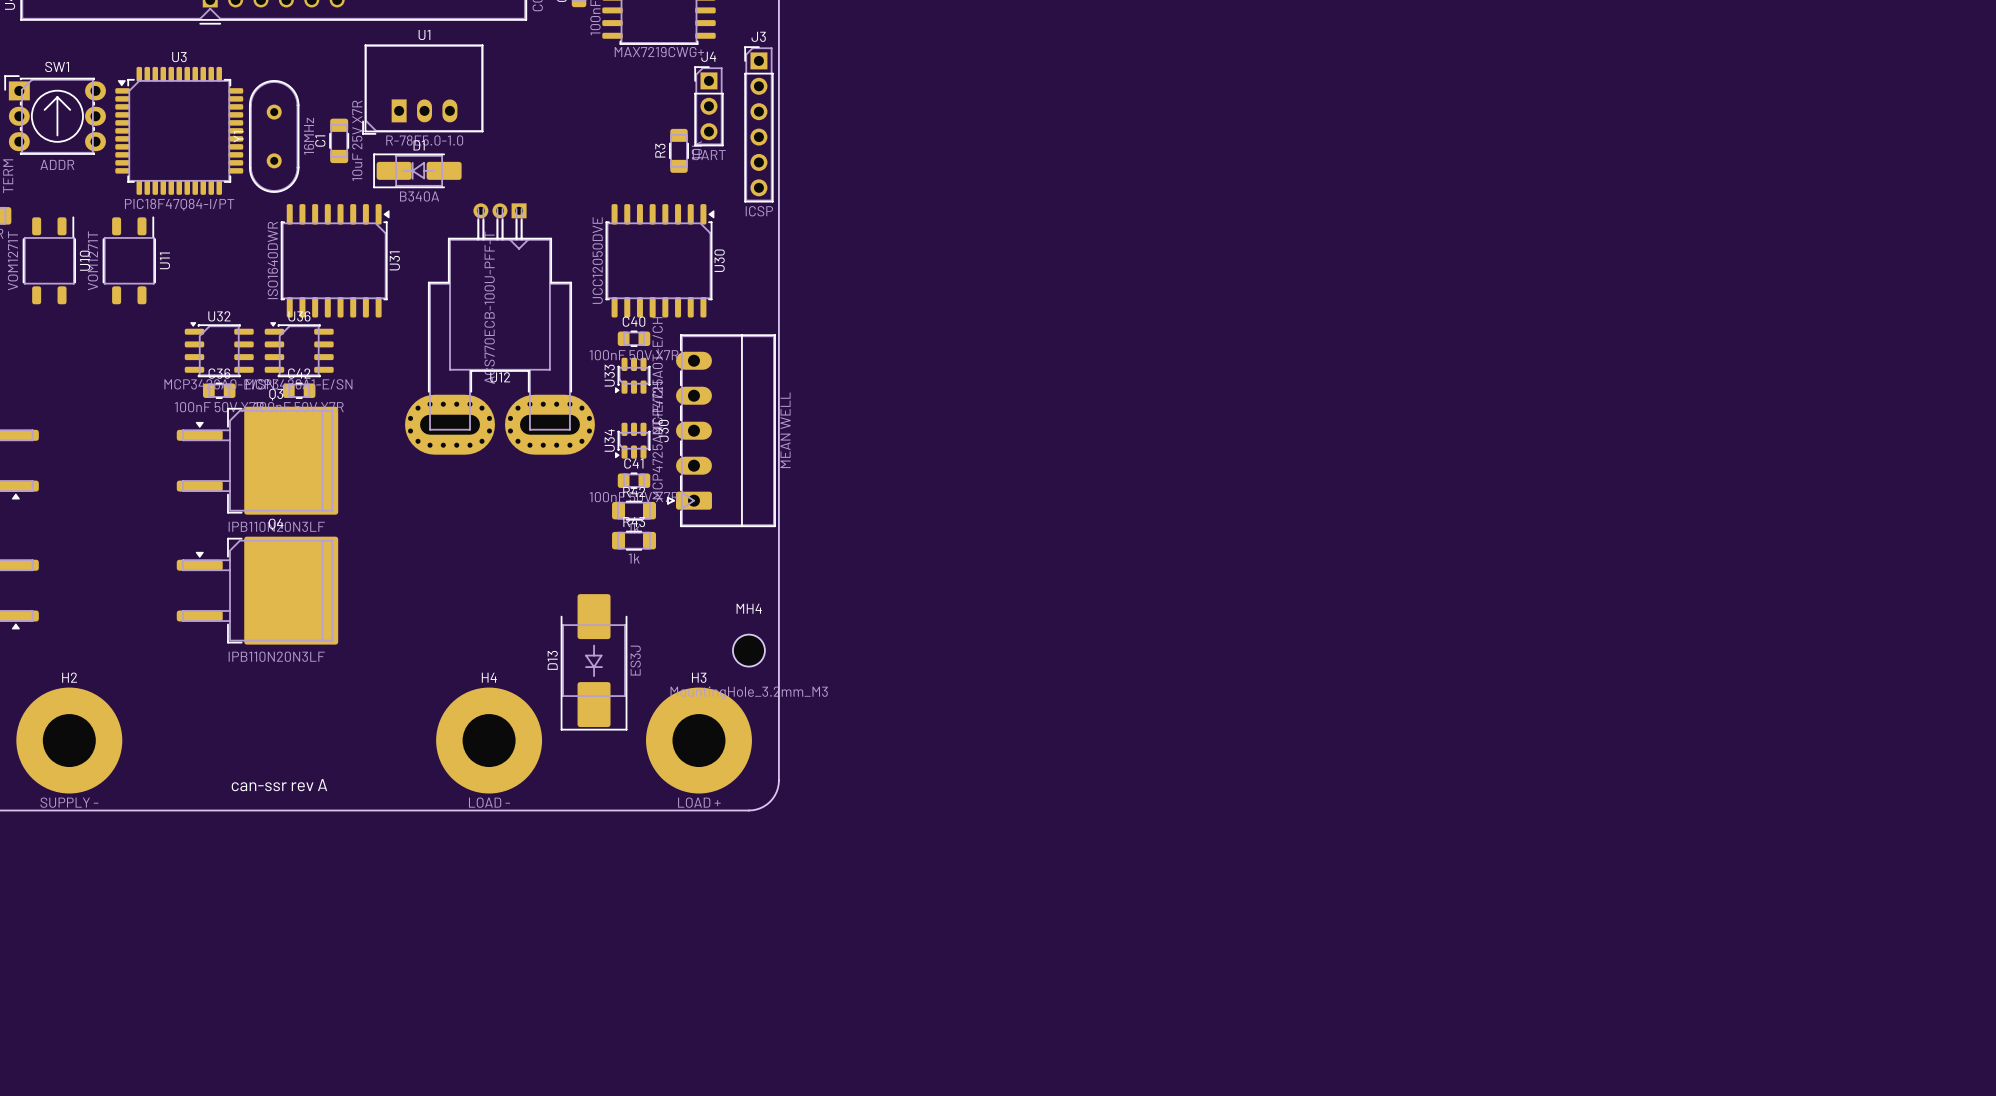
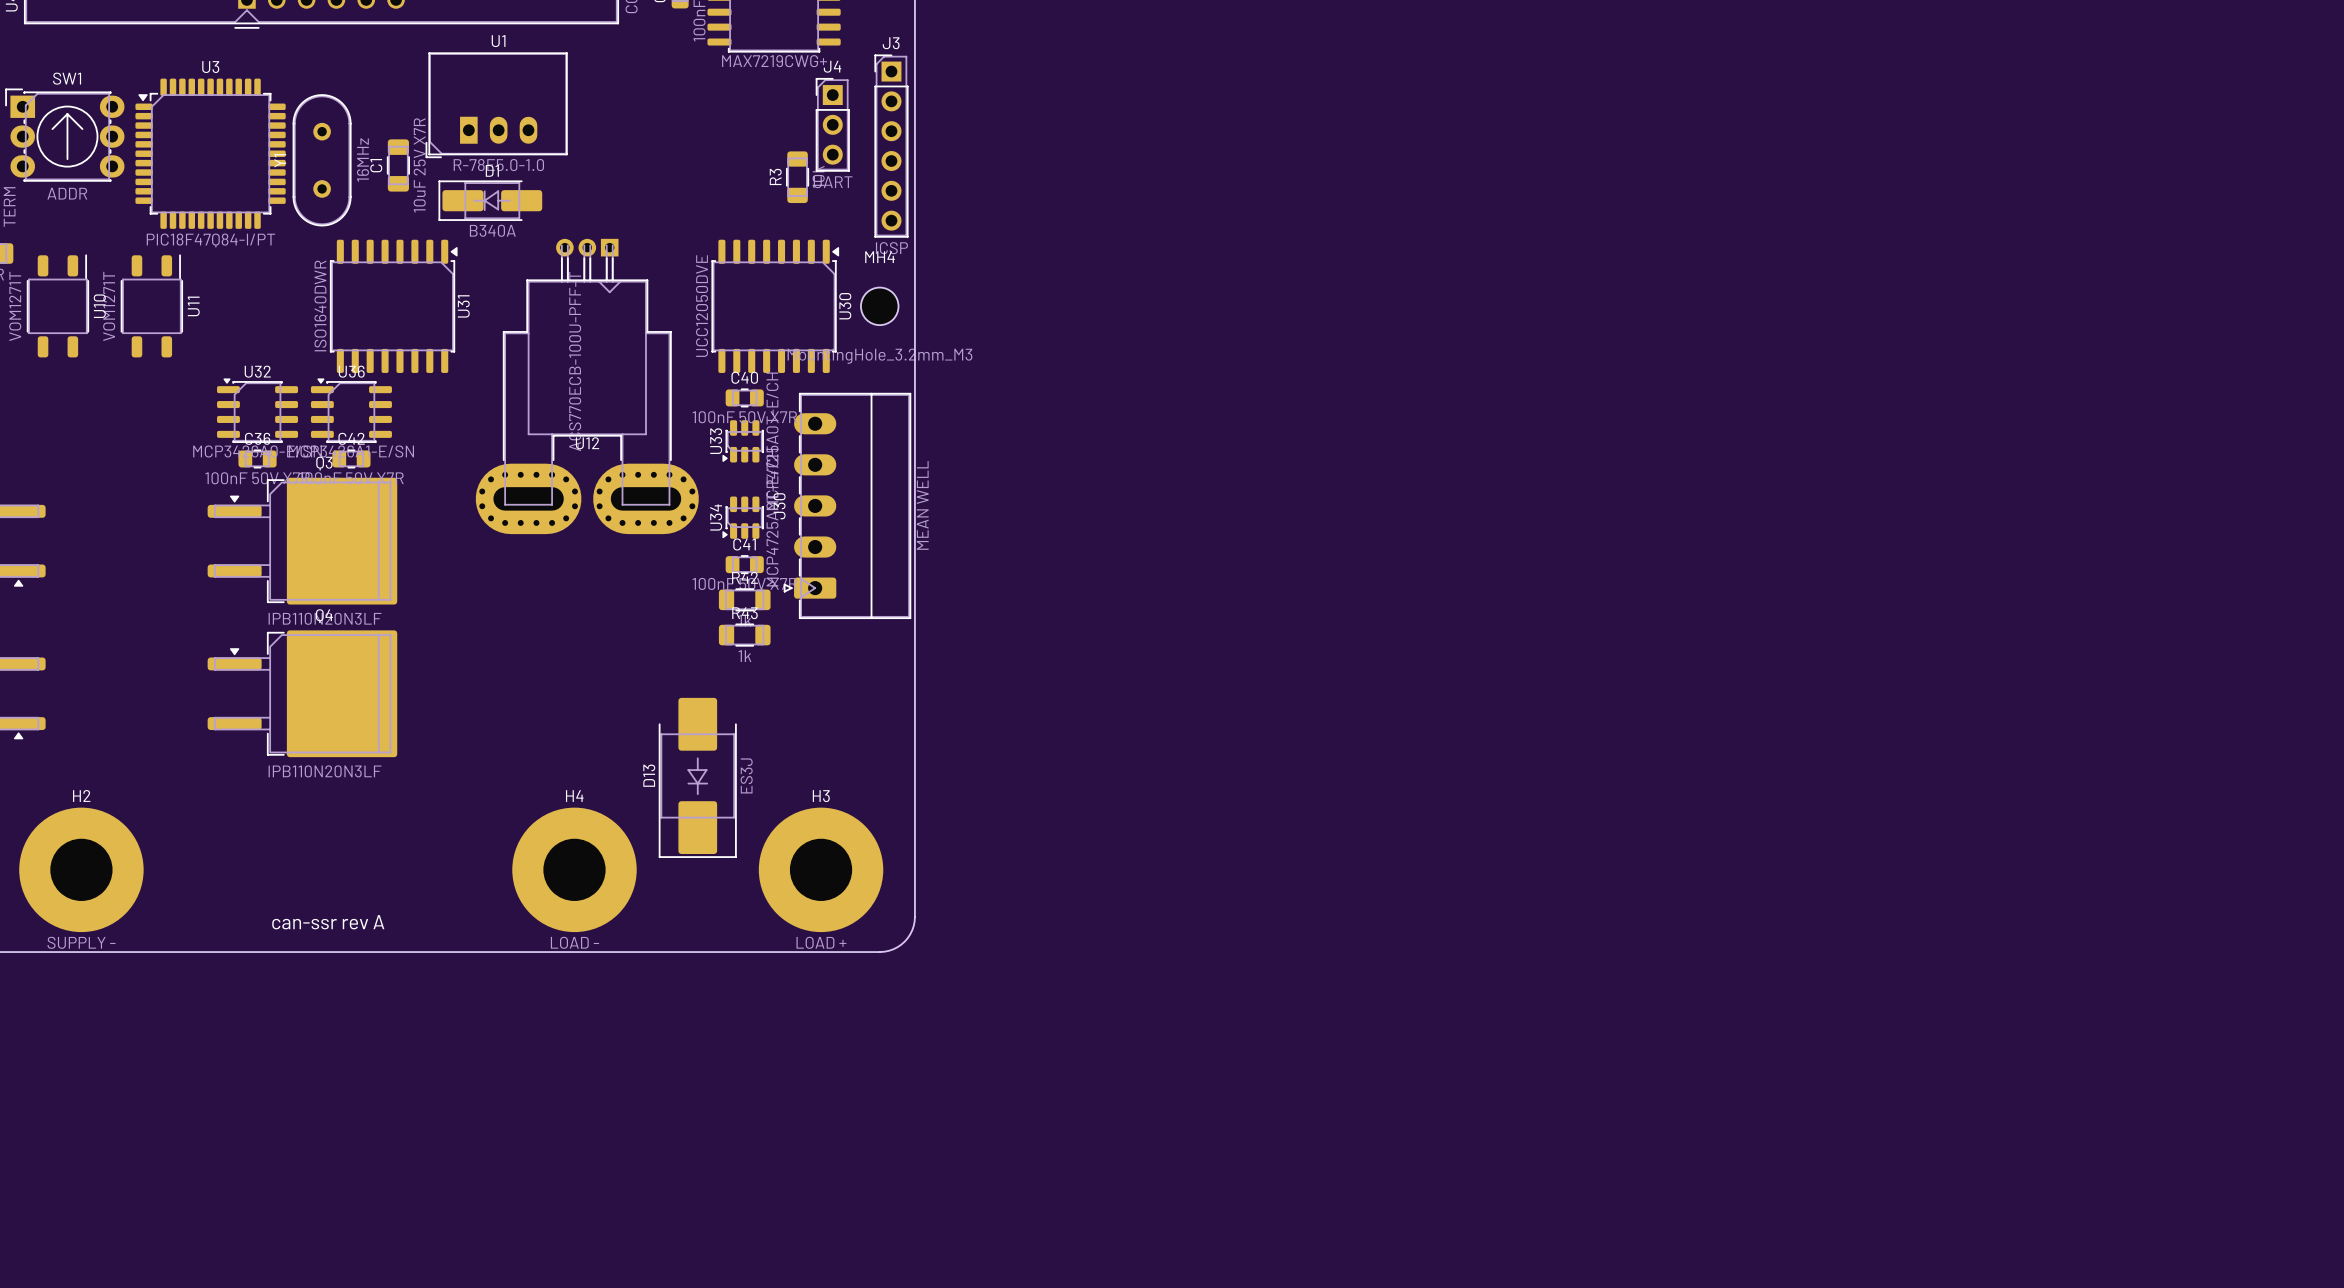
MH4 position: (748, 650) -> (879, 306)

